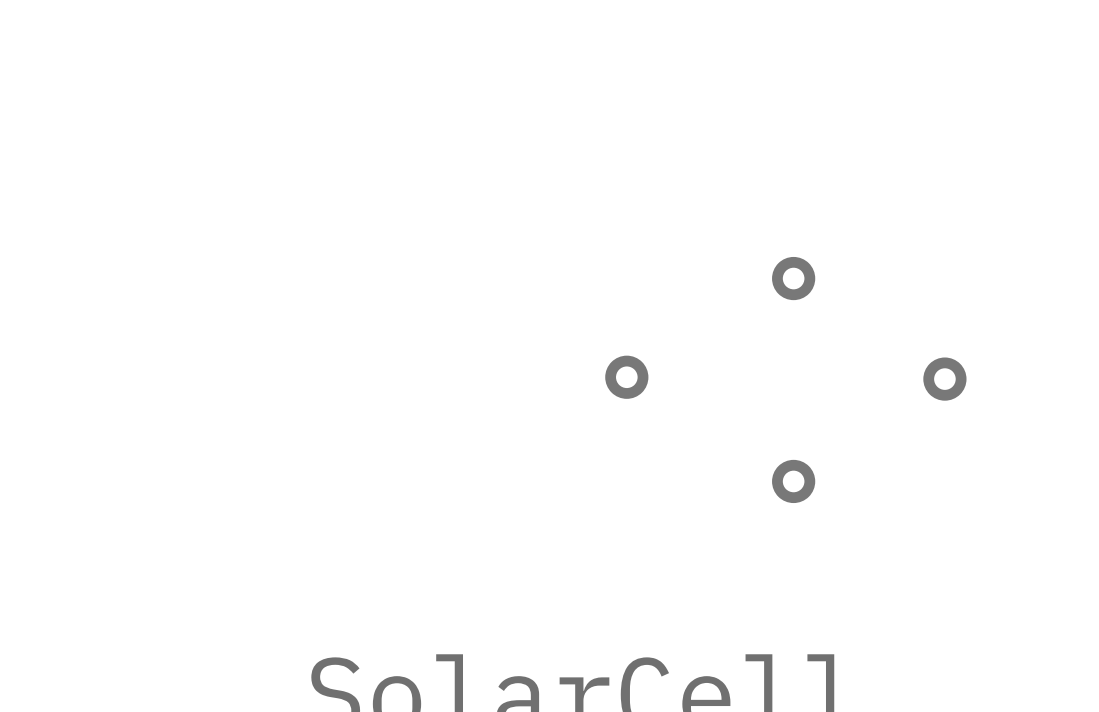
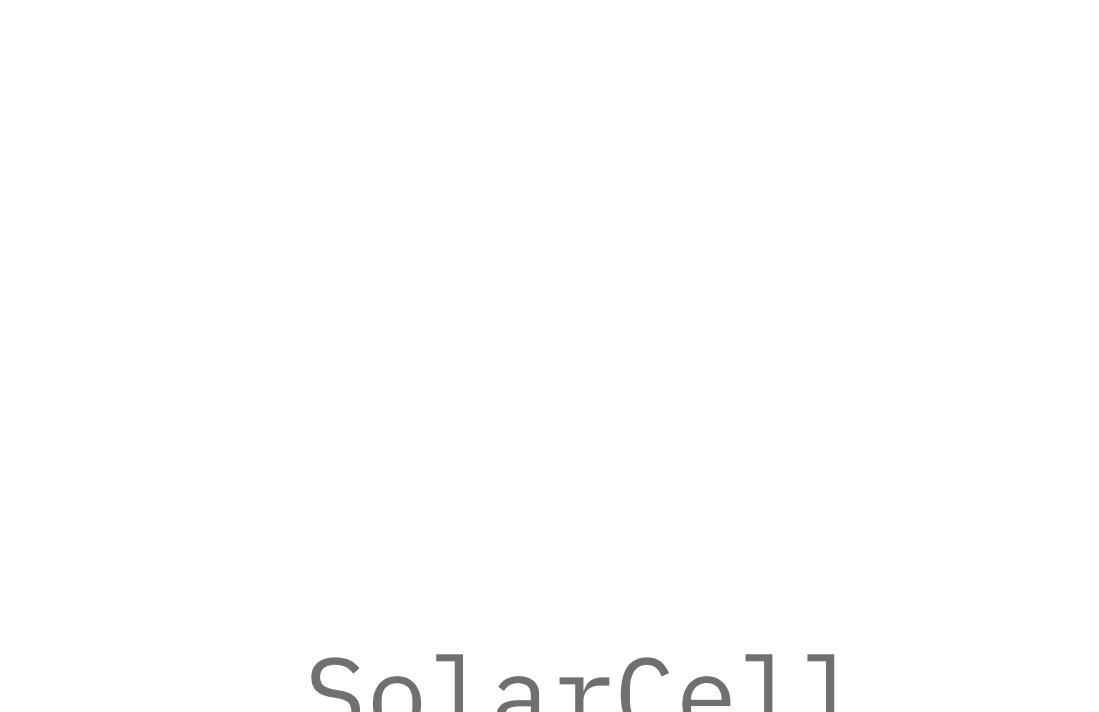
via: (793, 278) -> none
via: (626, 377) -> none
via: (944, 379) -> none
via: (793, 481) -> none

